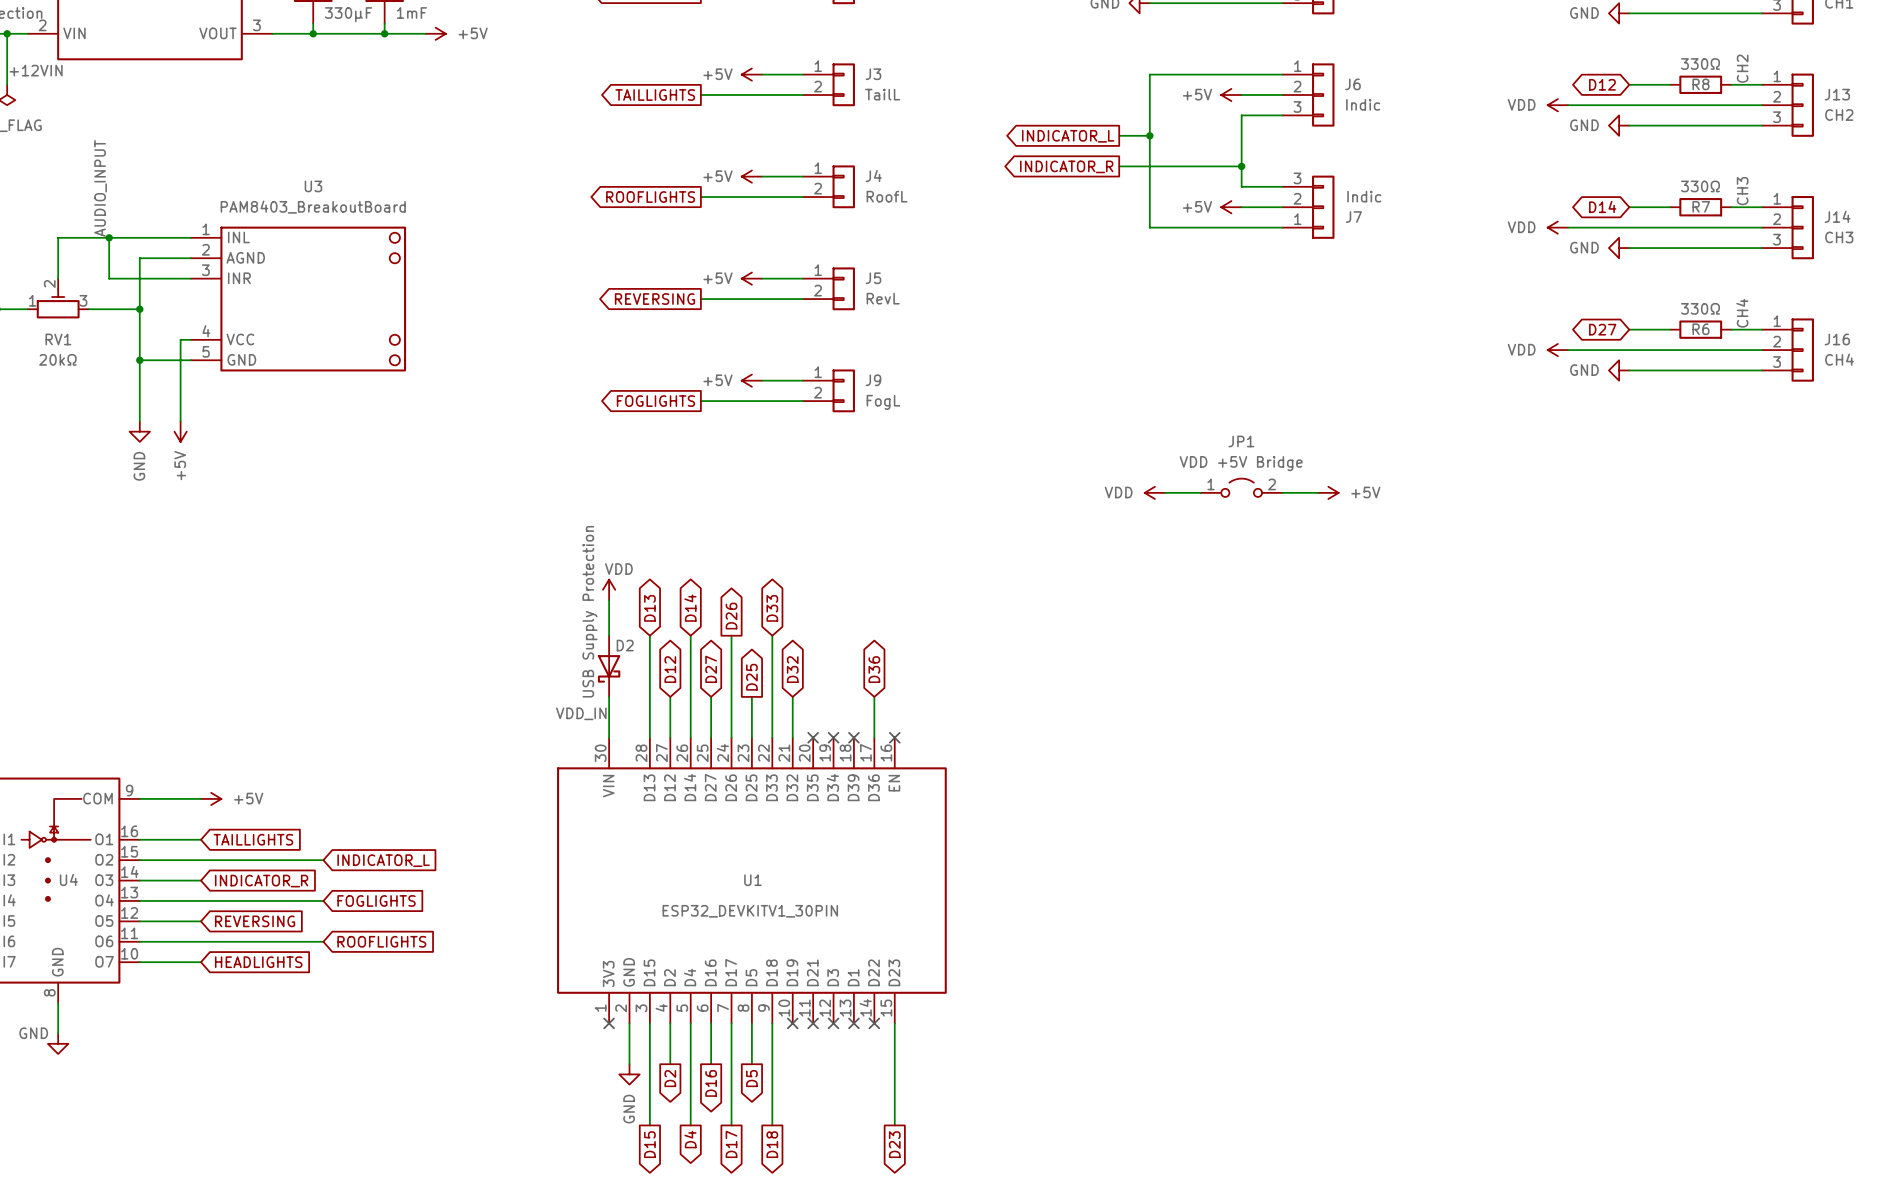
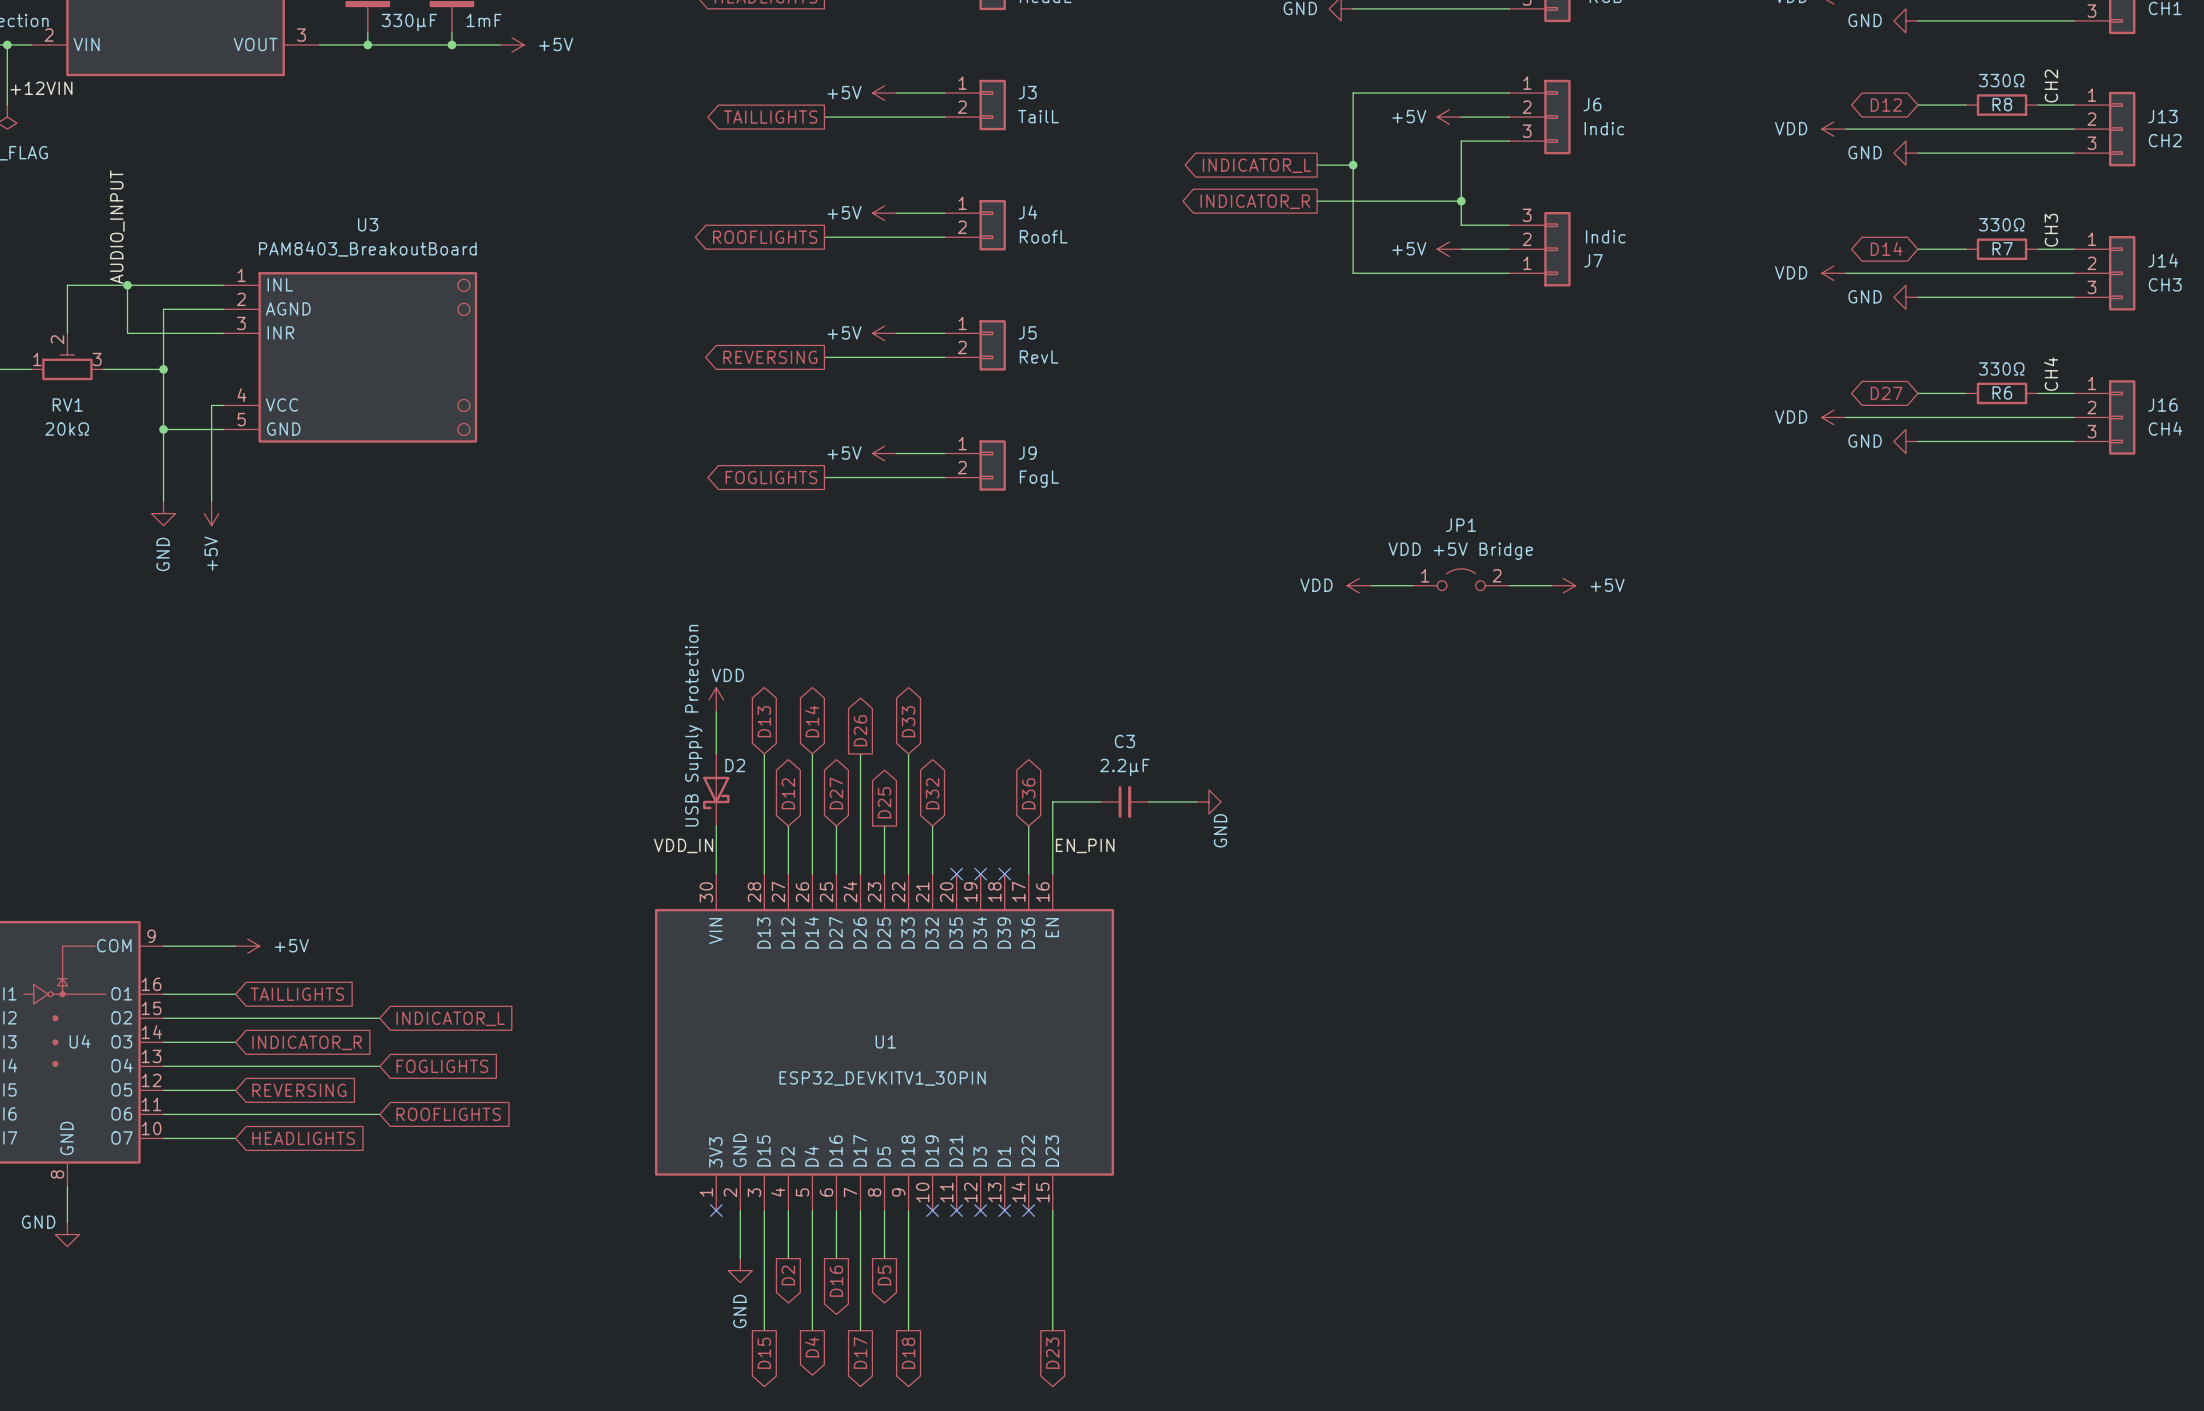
wire: none -> (1100, 801) (1052, 801) (1052, 874)
C3: none -> 2.2µF (1124, 801)
wire: none -> (1148, 801) (1196, 801)
power symbol: none -> GND (1208, 801)
label: none -> EN_PIN (1085, 845)
no-connect mark: (894, 737) -> none

